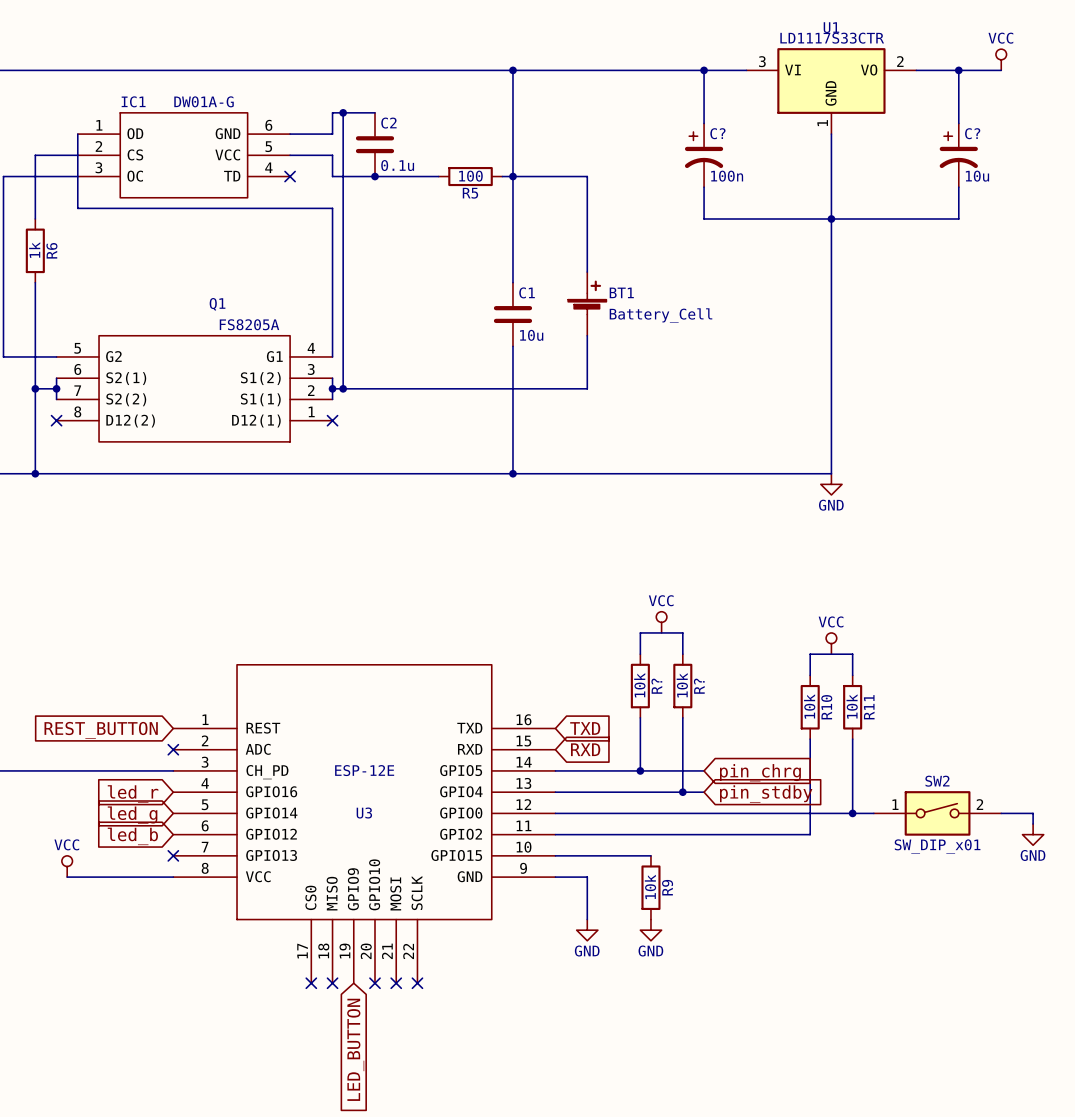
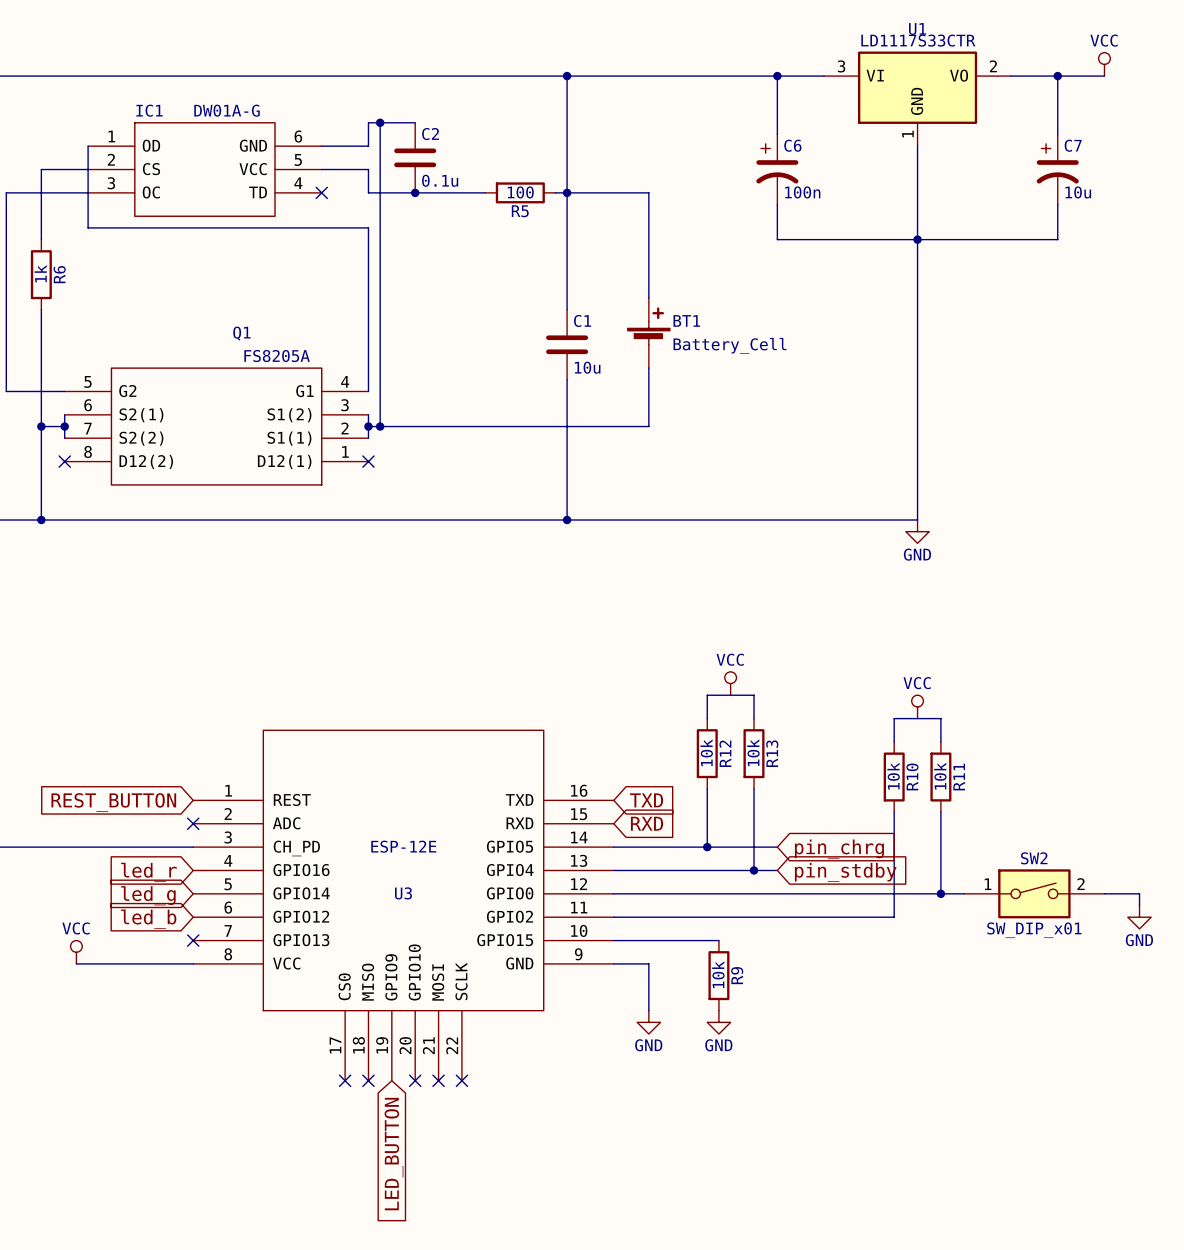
C? name: C? (717, 133) -> C6 (792, 145)
C? name: C? (972, 133) -> C7 (1073, 145)
R? name: R? (656, 686) -> R12 (725, 753)
R? name: R? (699, 686) -> R13 (772, 753)

